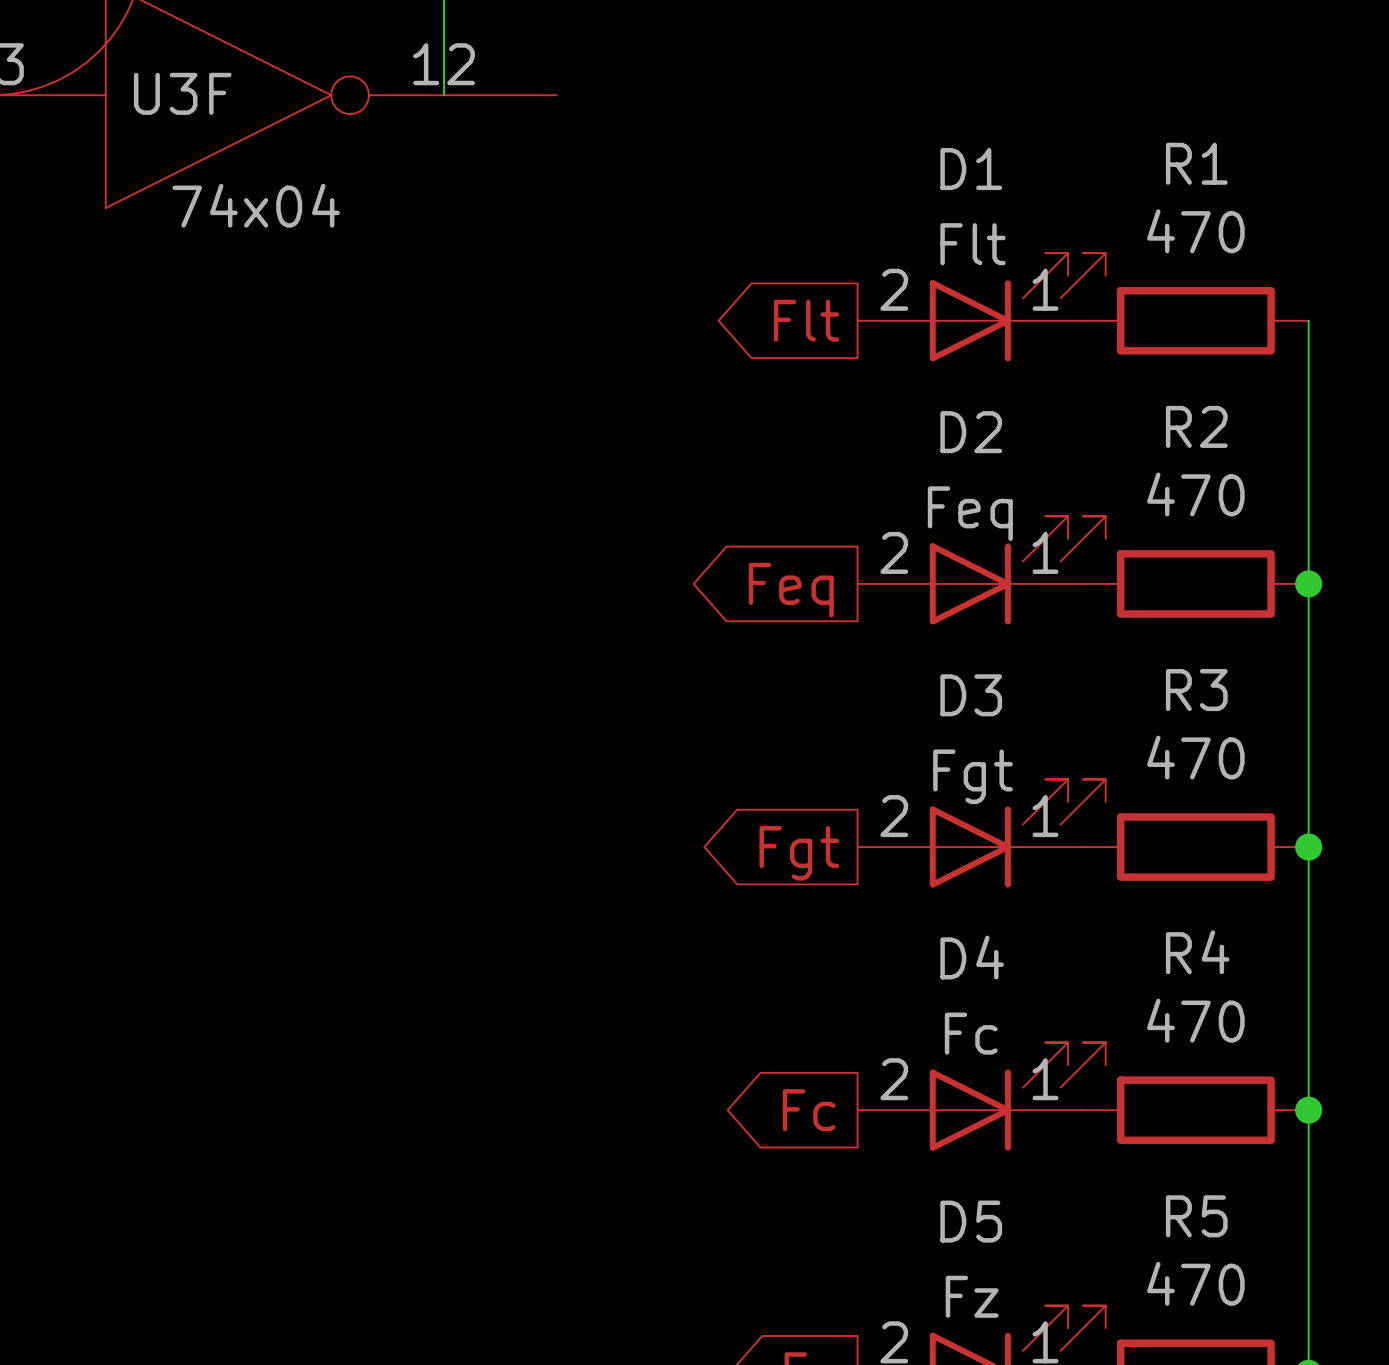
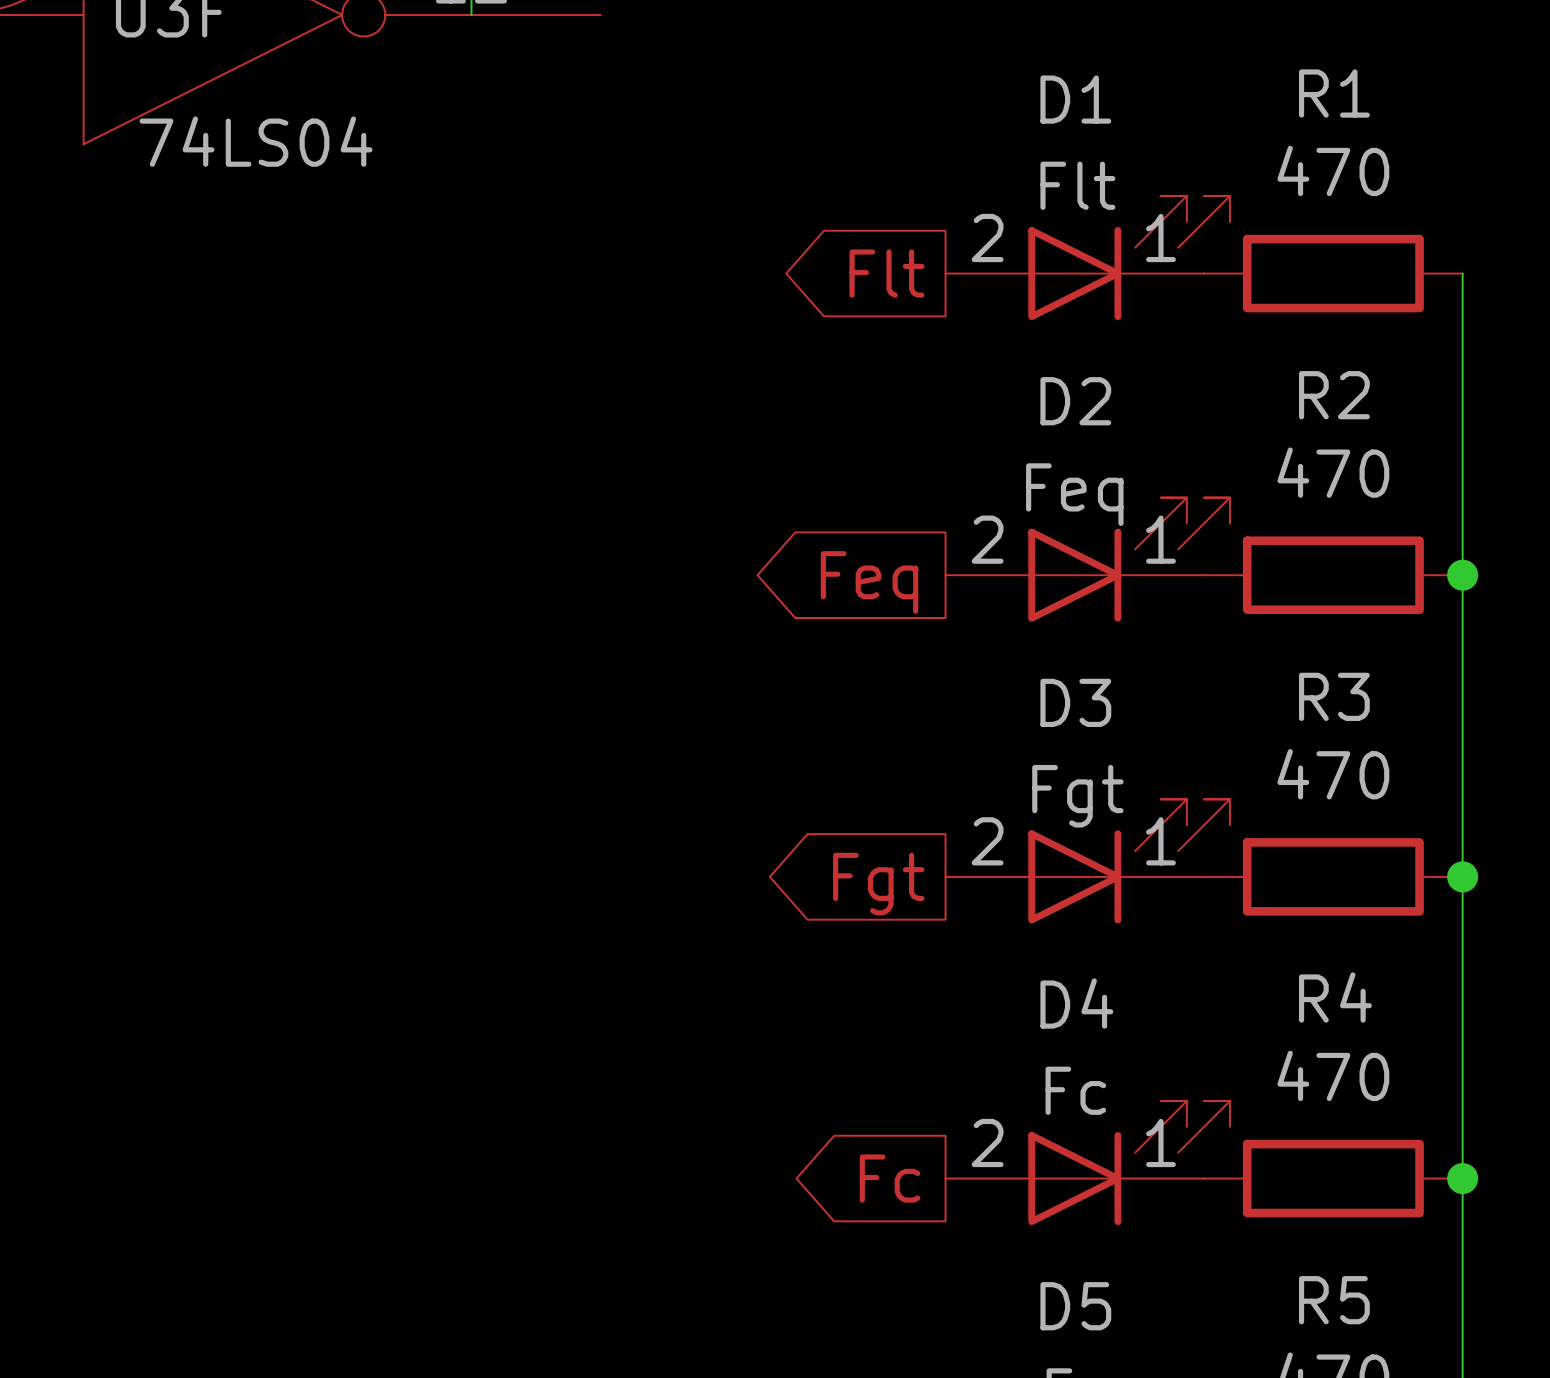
U3F value: 74x04 (256, 205) -> 74LS04 (256, 141)

